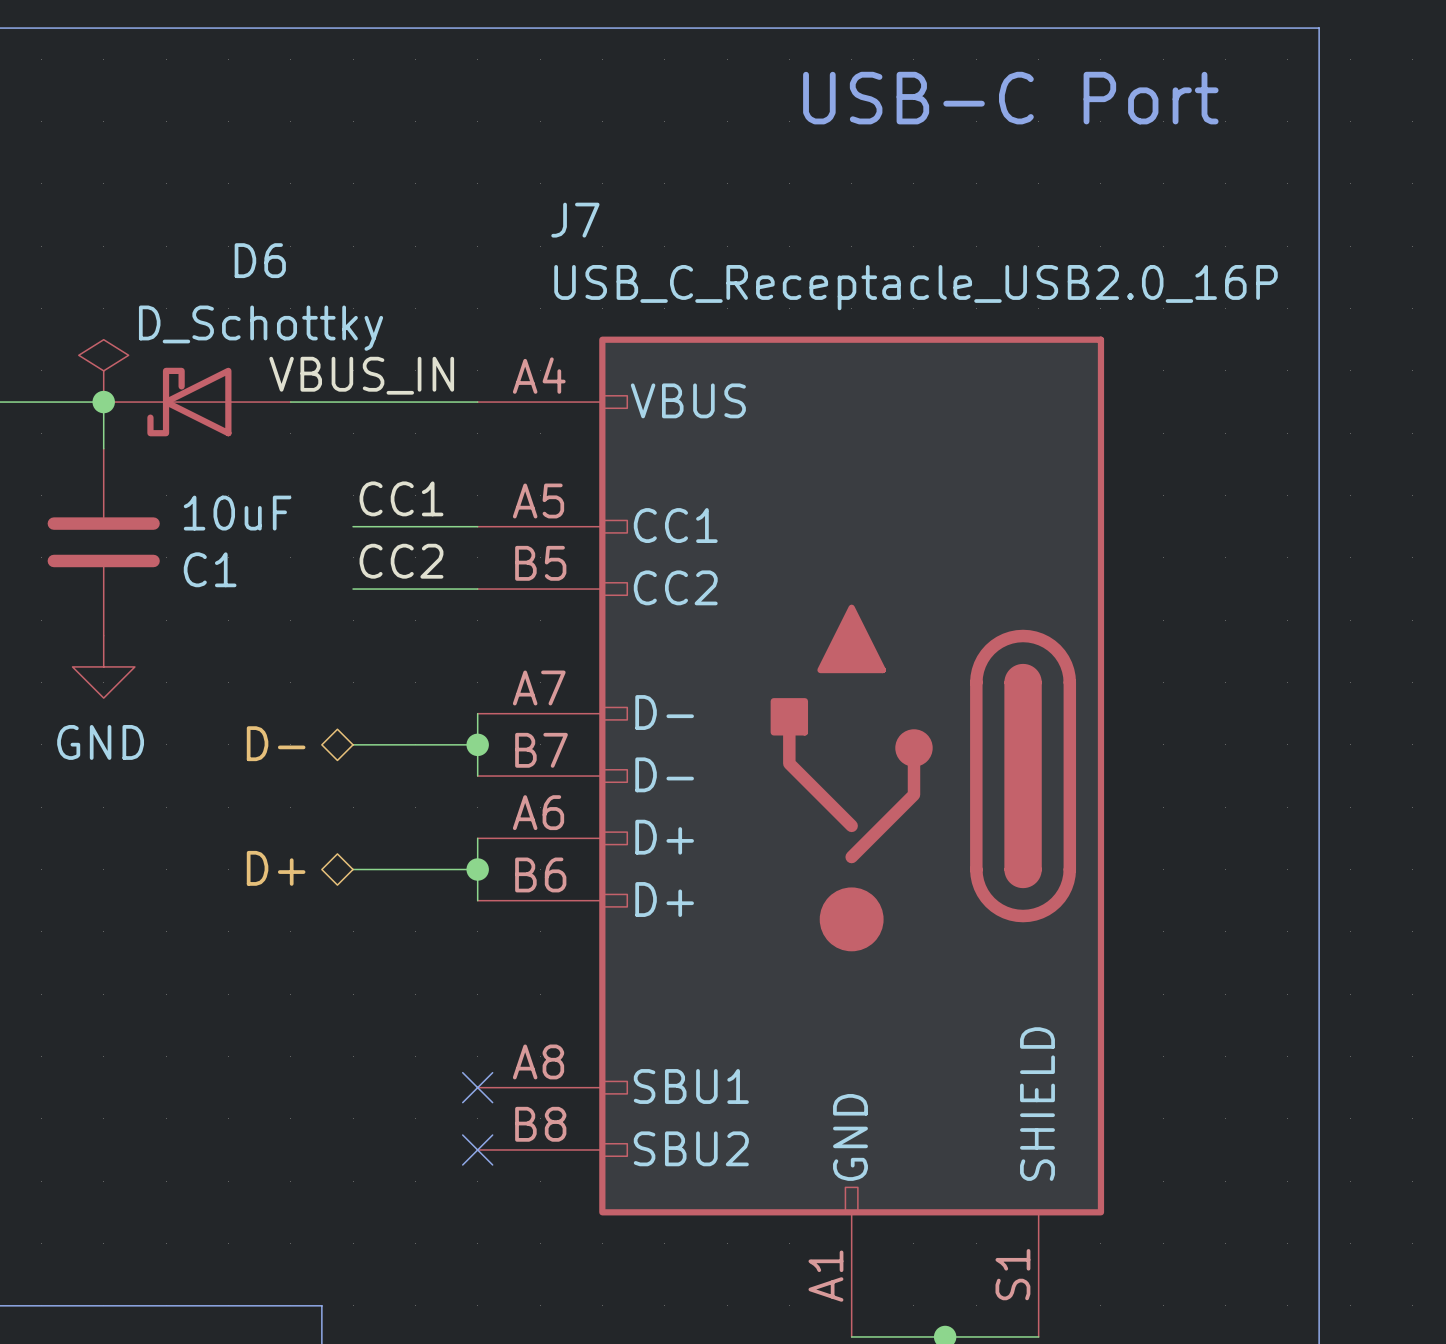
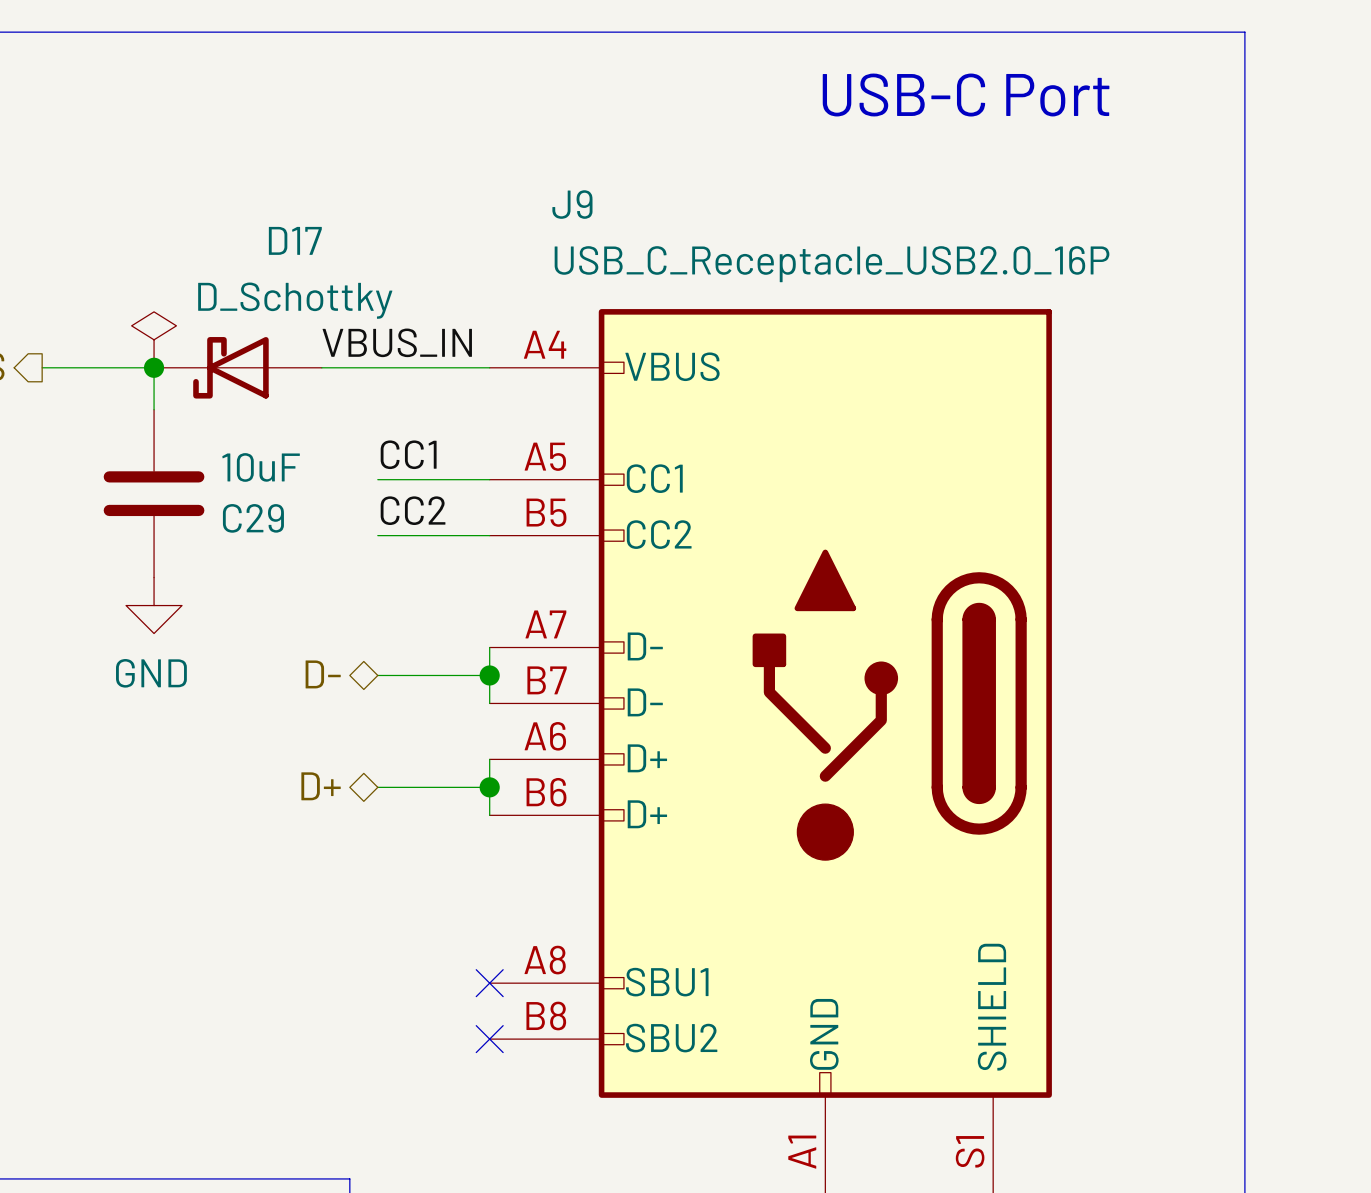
J7 name: J7 (575, 220) -> J9 (572, 204)
D6 name: D6 (260, 260) -> D17 (295, 240)
C1 name: C1 (210, 569) -> C29 (253, 518)

